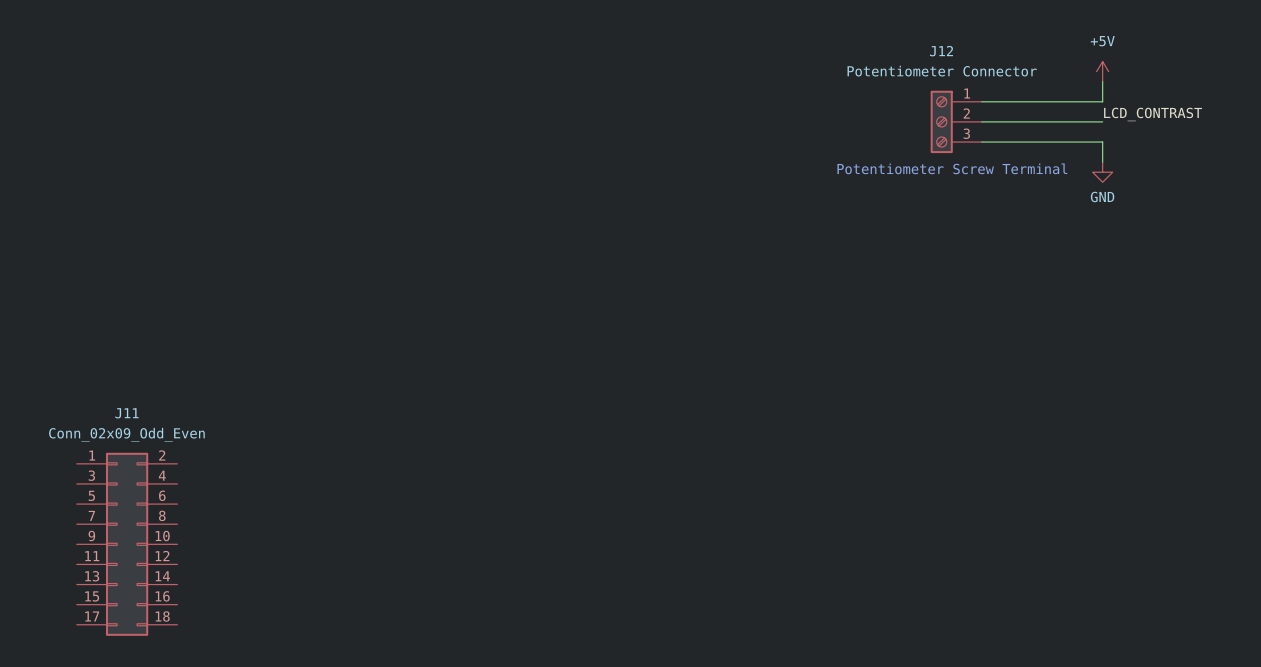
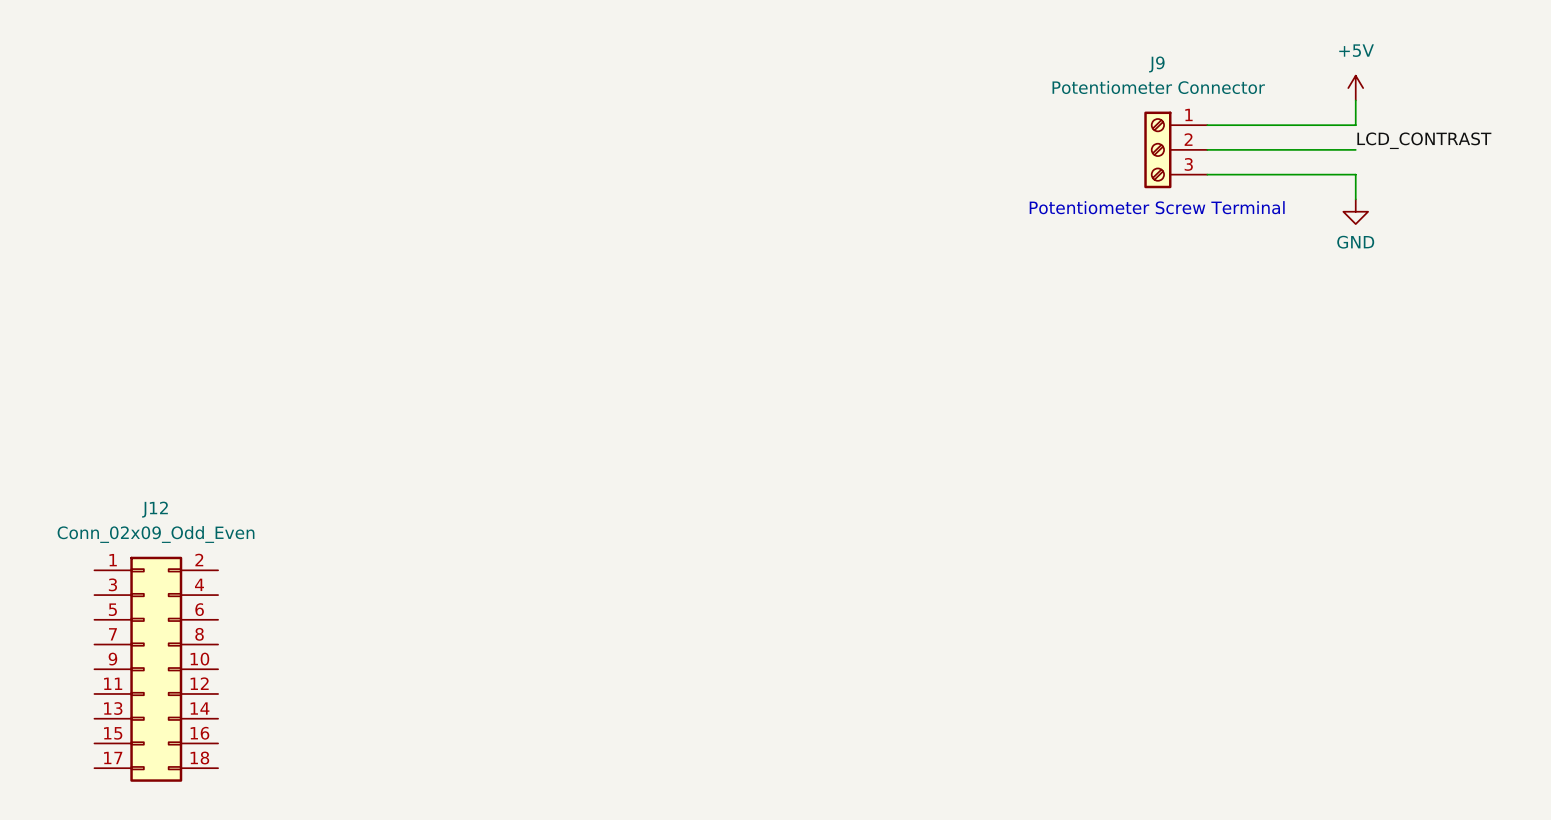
J12 name: J12 (941, 51) -> J9 (1156, 64)
J11 name: J11 (126, 413) -> J12 (154, 509)

